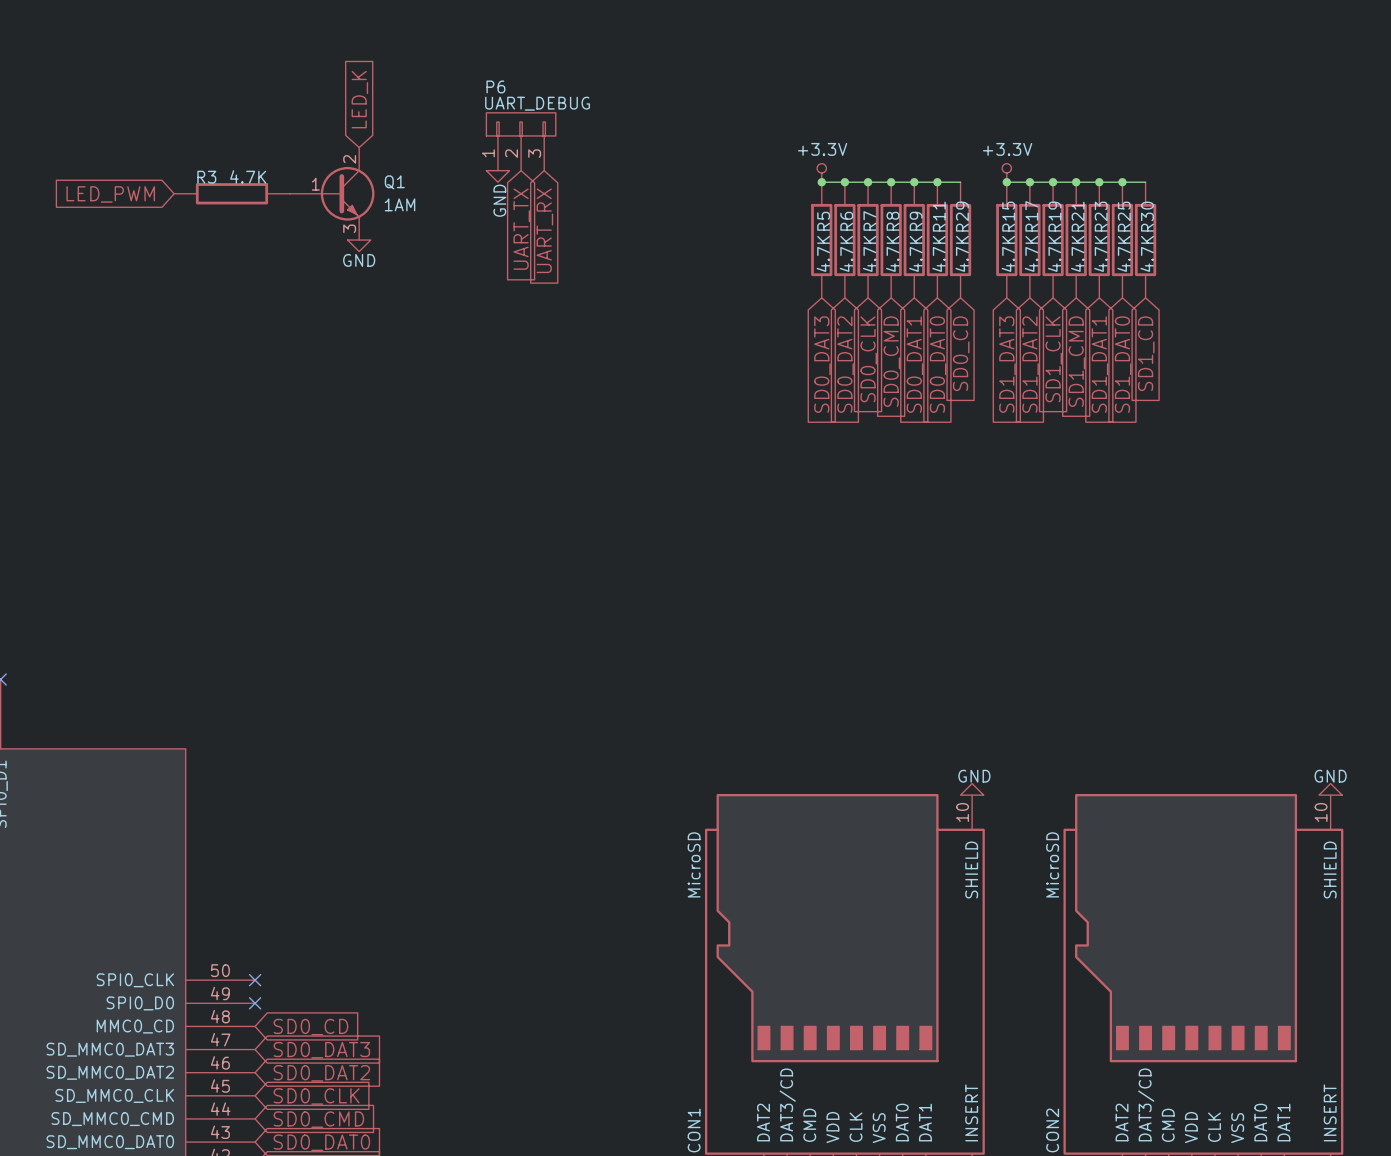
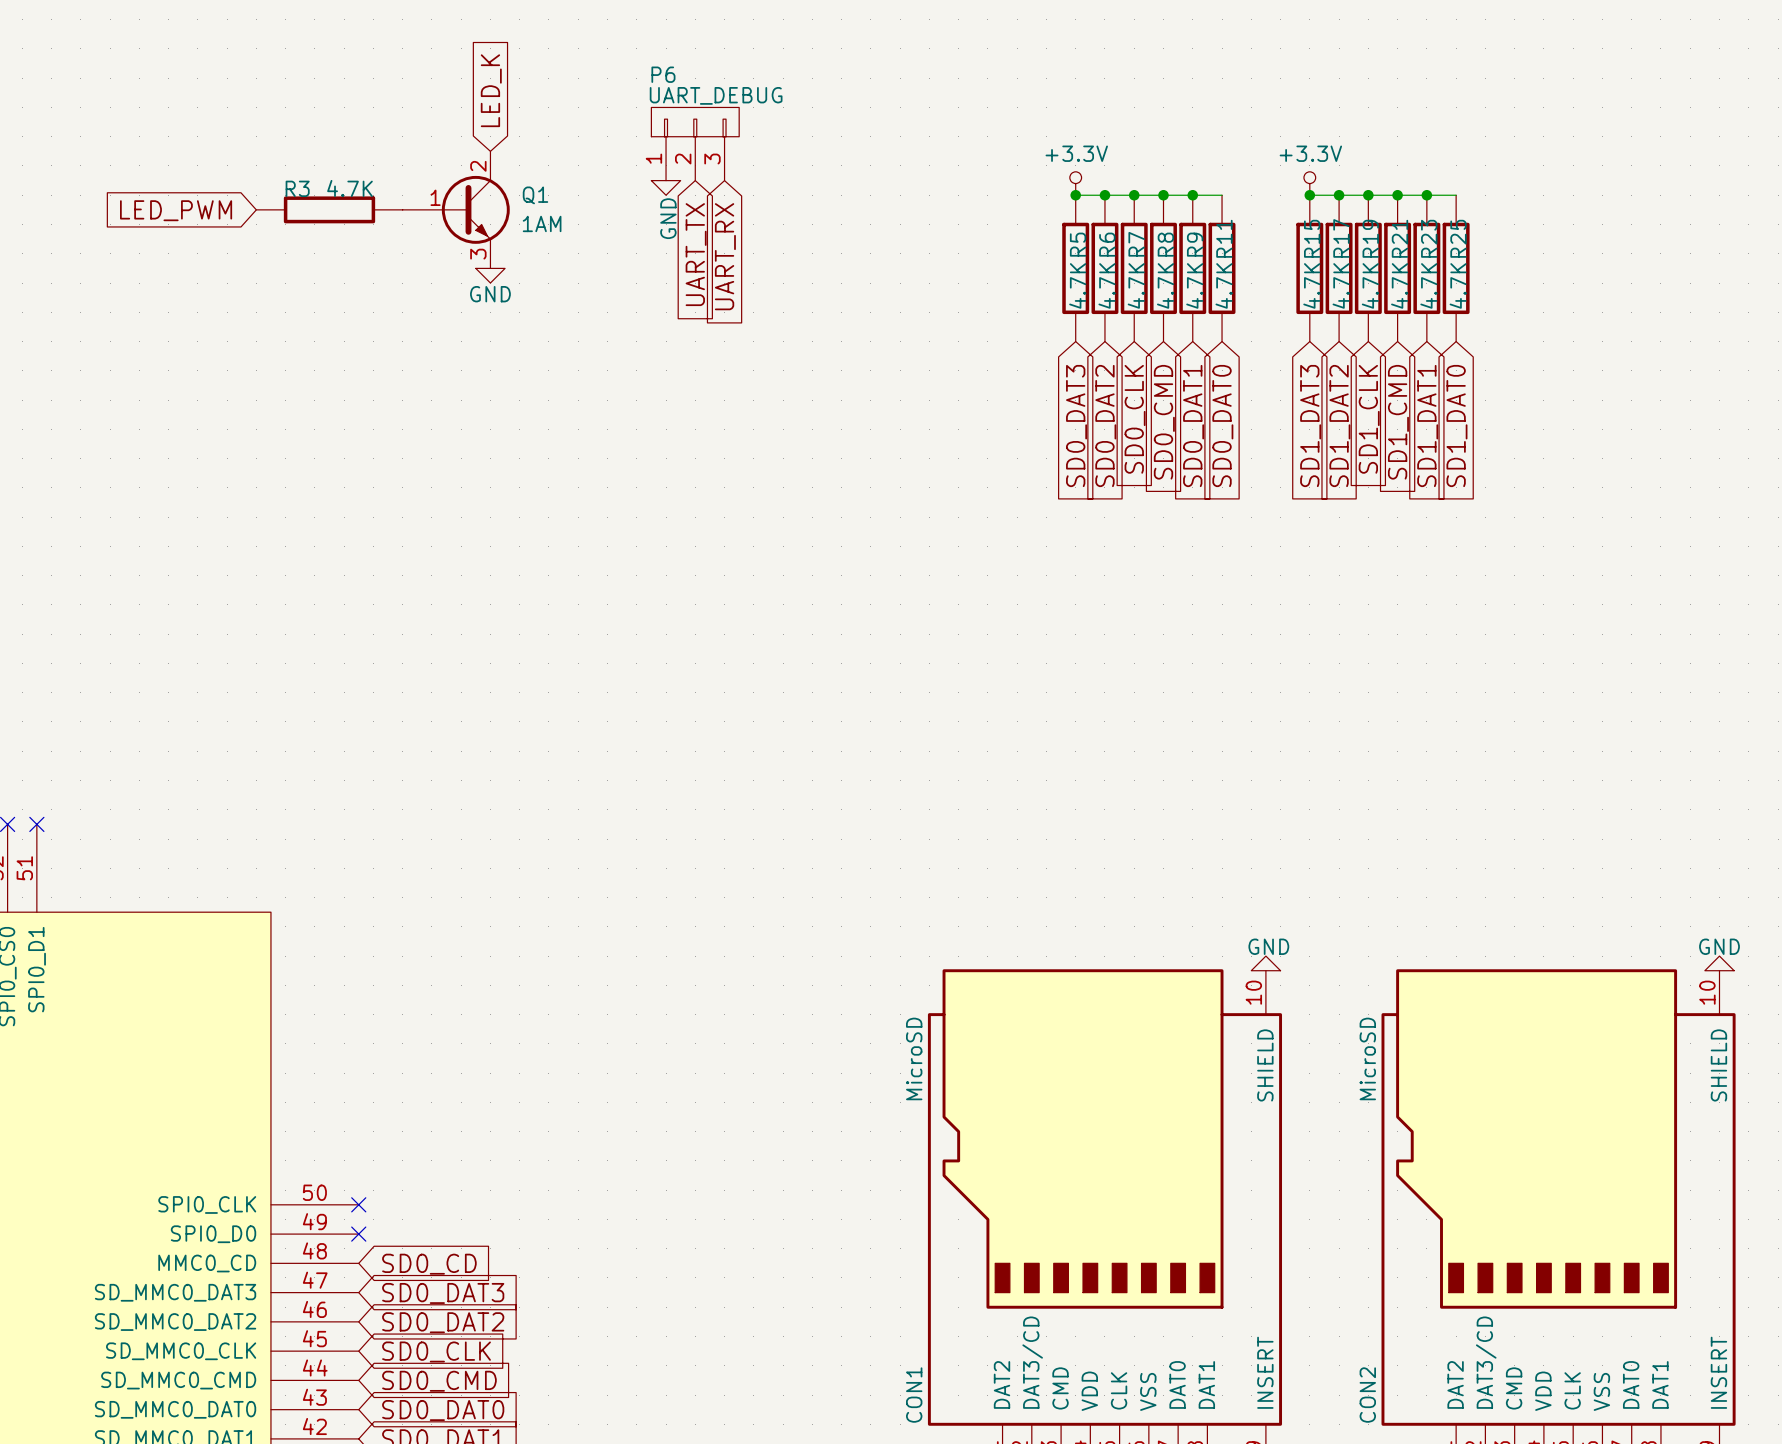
wire: (937, 182) (960, 182) -> none
junction: (937, 182) -> none
wire: (1122, 182) (1145, 182) -> none
junction: (1122, 182) -> none
R29: 4.7K (960, 240) -> none
R30: 4.7K (1145, 240) -> none
global label: SD0_CD (961, 353) -> none
global label: SD1_CD (1146, 353) -> none

